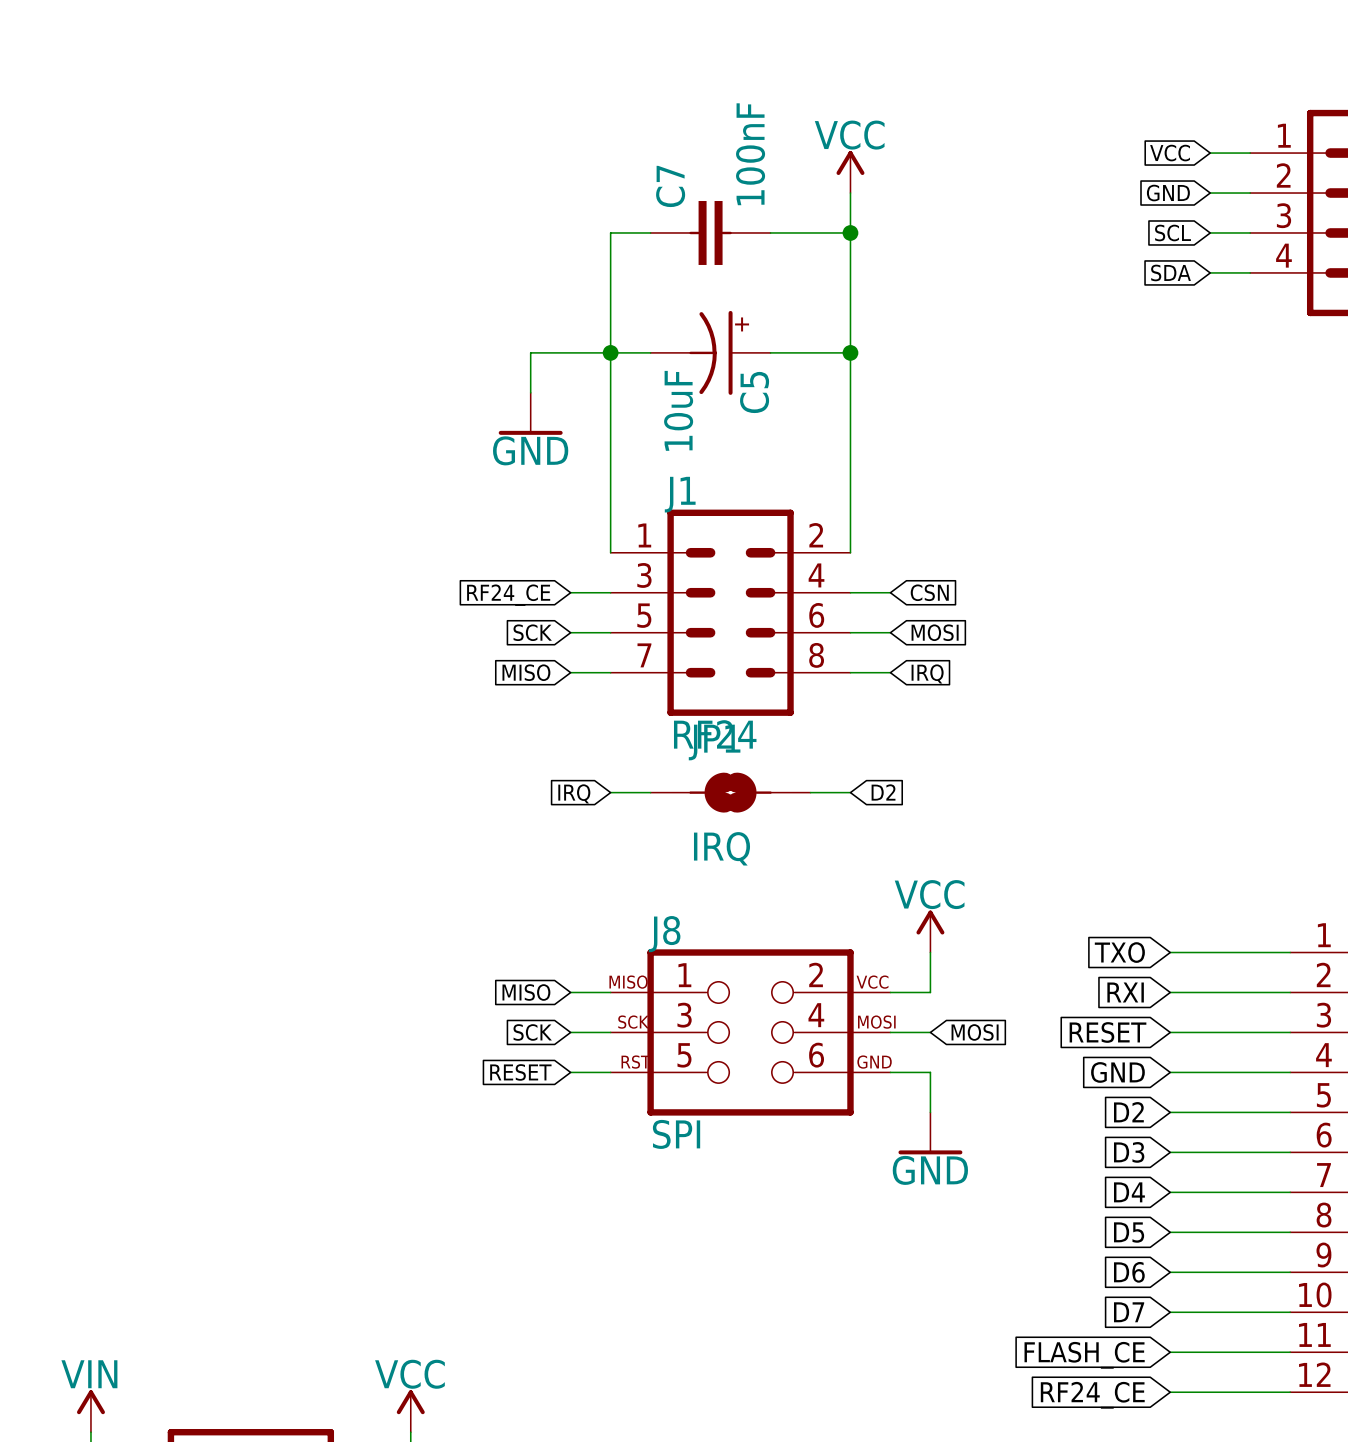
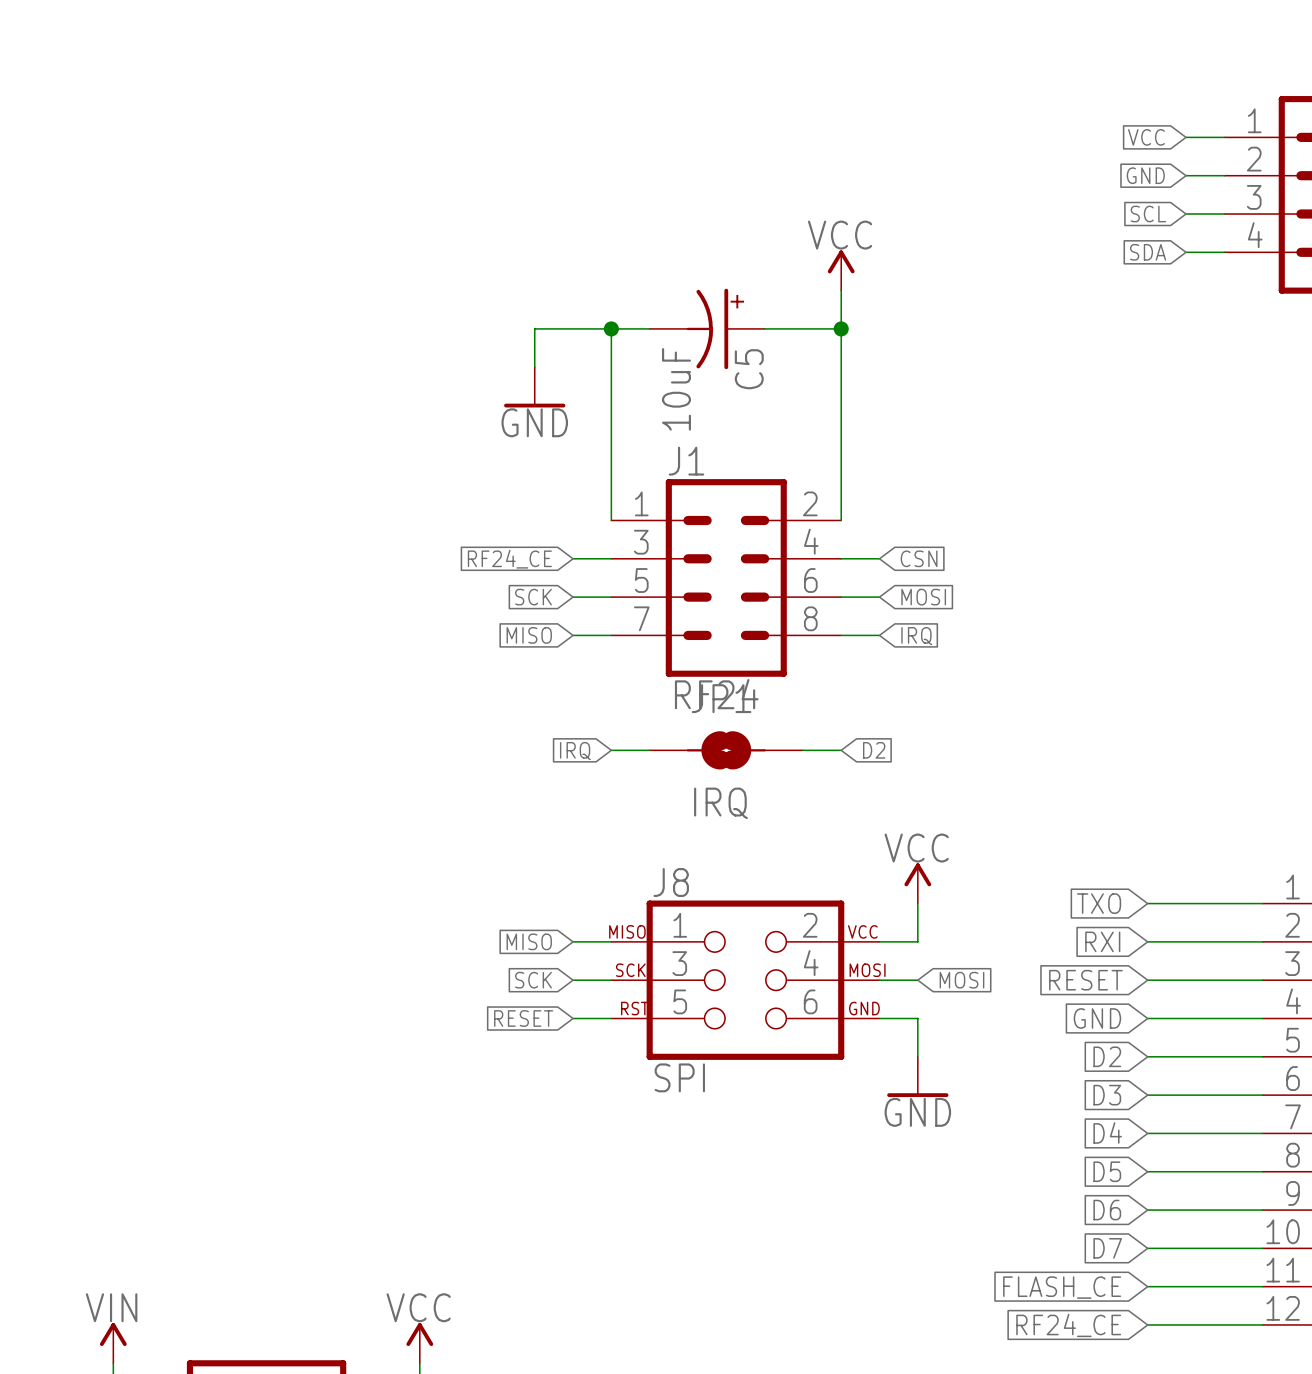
power symbol position: VCC (850, 172) -> VCC (841, 270)
wire: (850, 193) (850, 312) -> none
wire: (650, 232) (610, 232) (610, 352) -> none
C7: 100nF (710, 232) -> none
wire: (770, 232) (850, 232) -> none
junction: (850, 232) -> none

